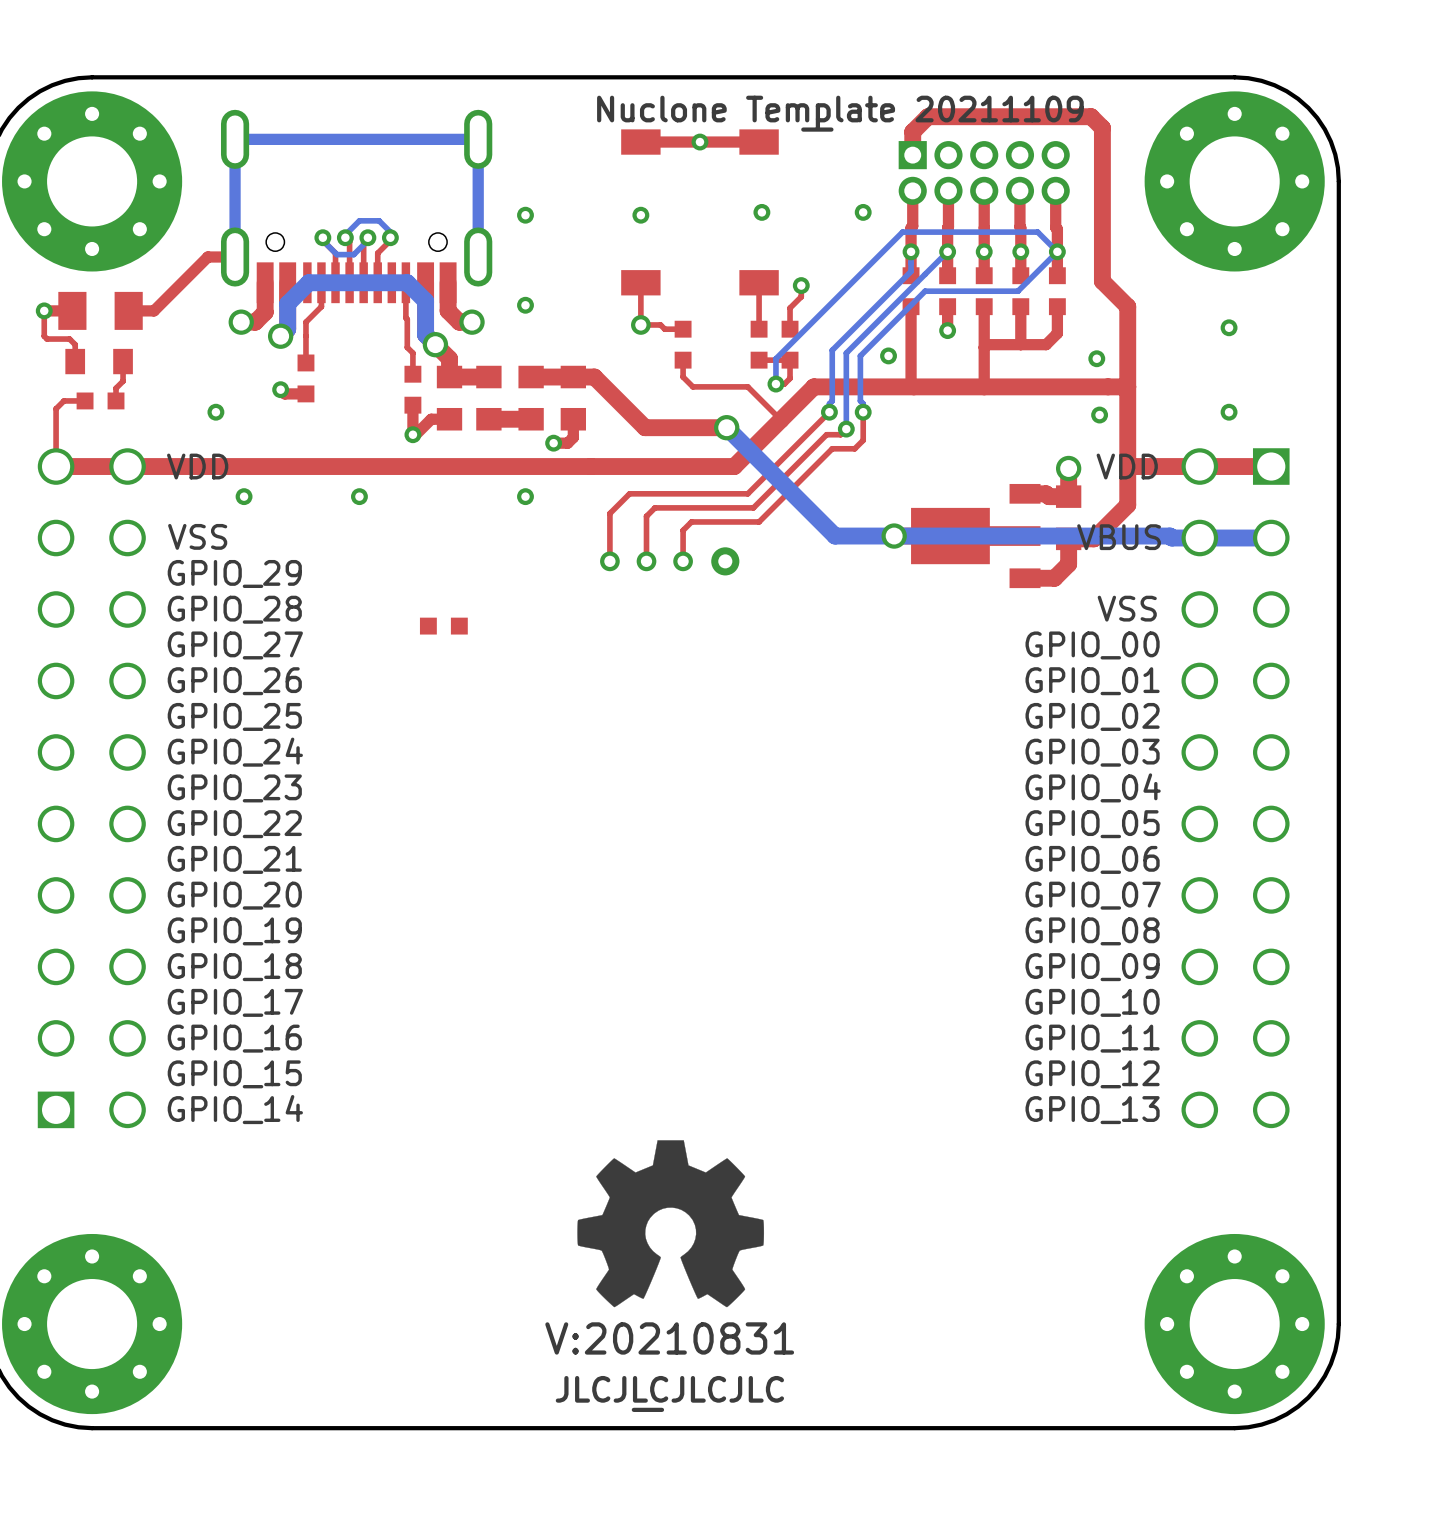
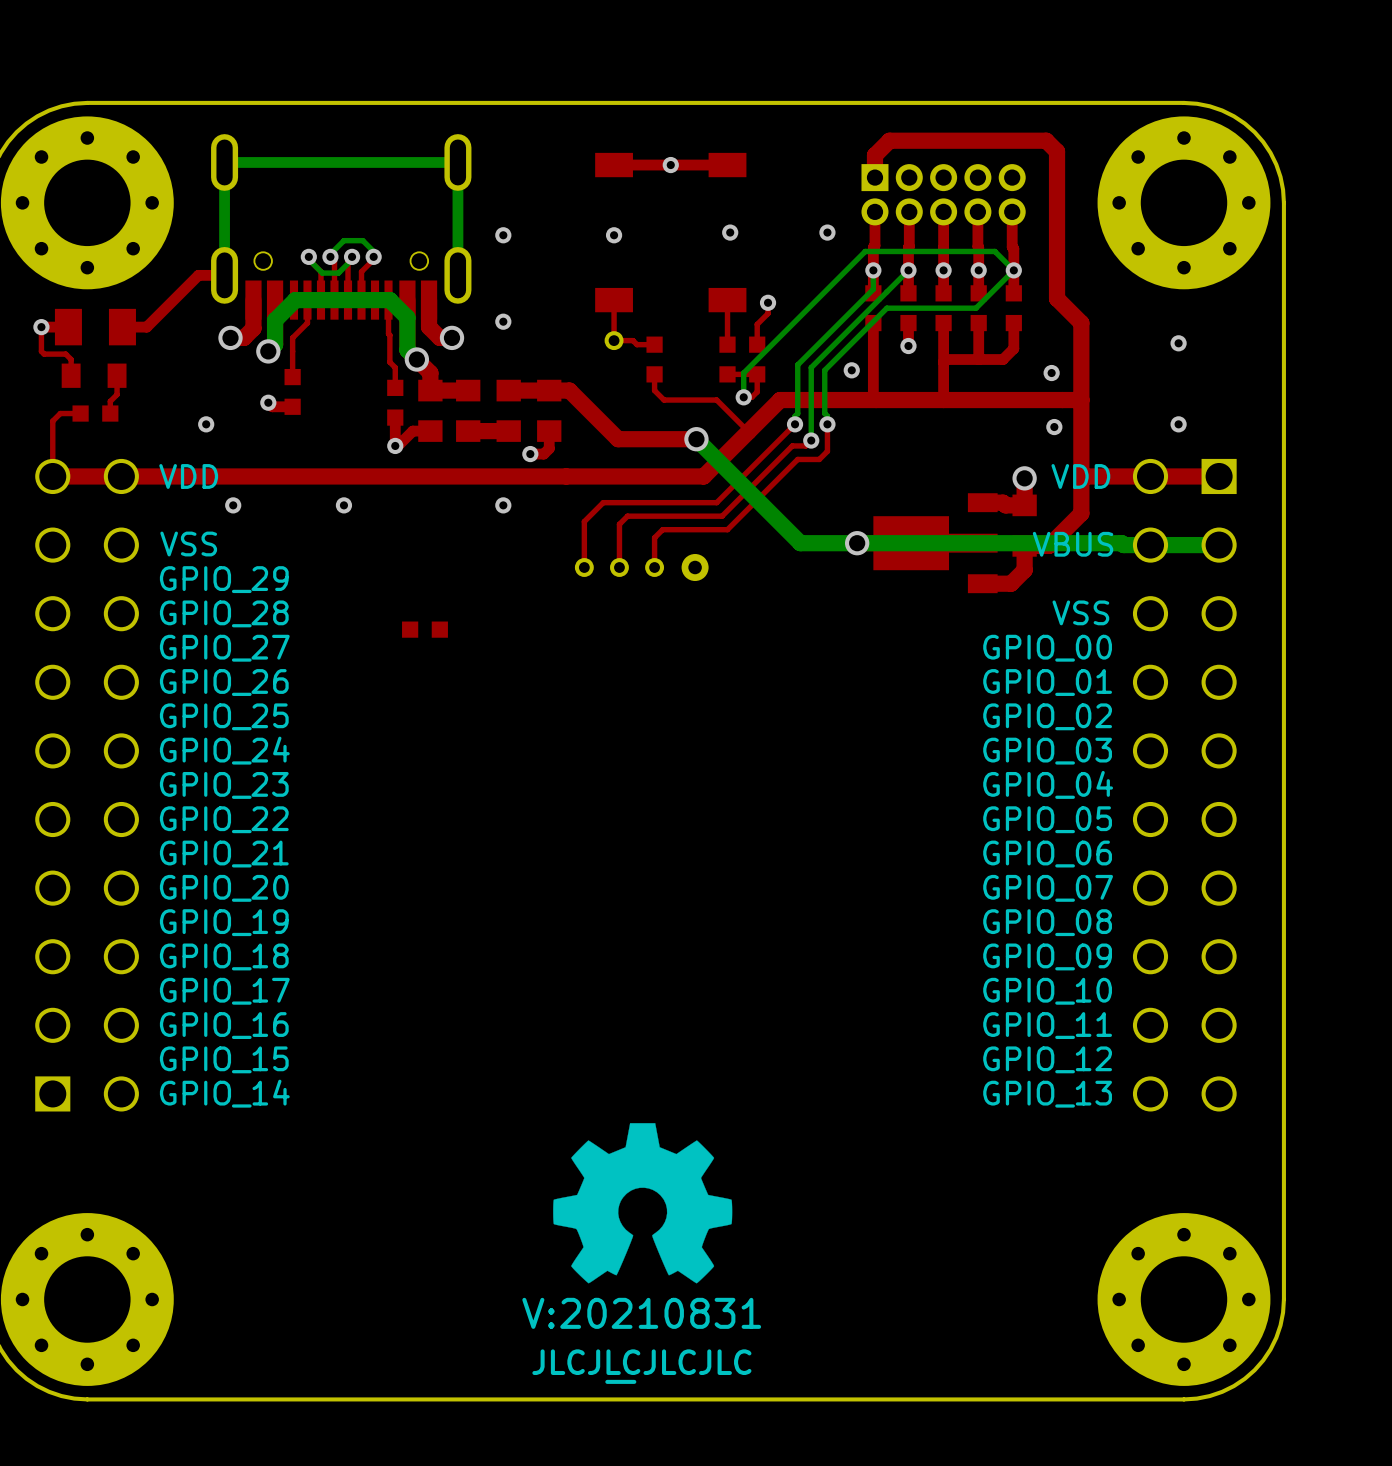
drawing: [801, 127, 834, 132] -> none

